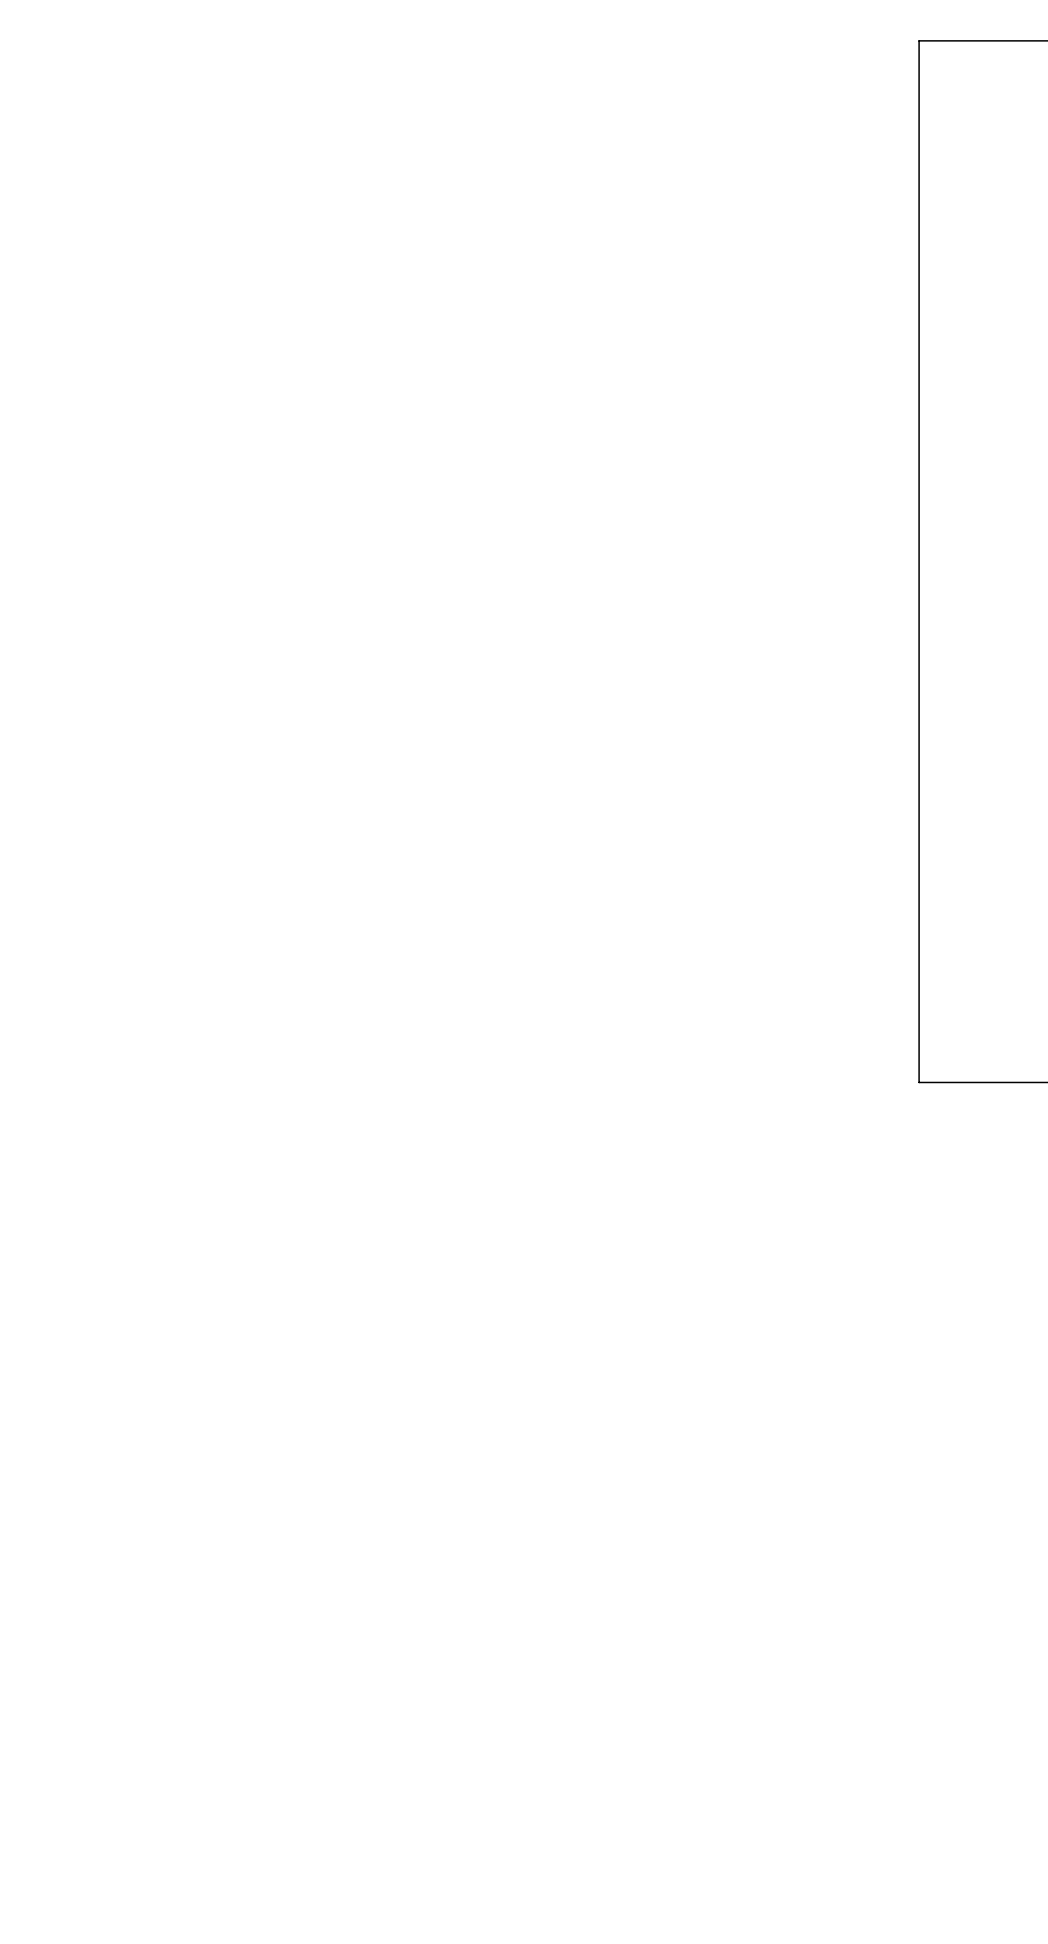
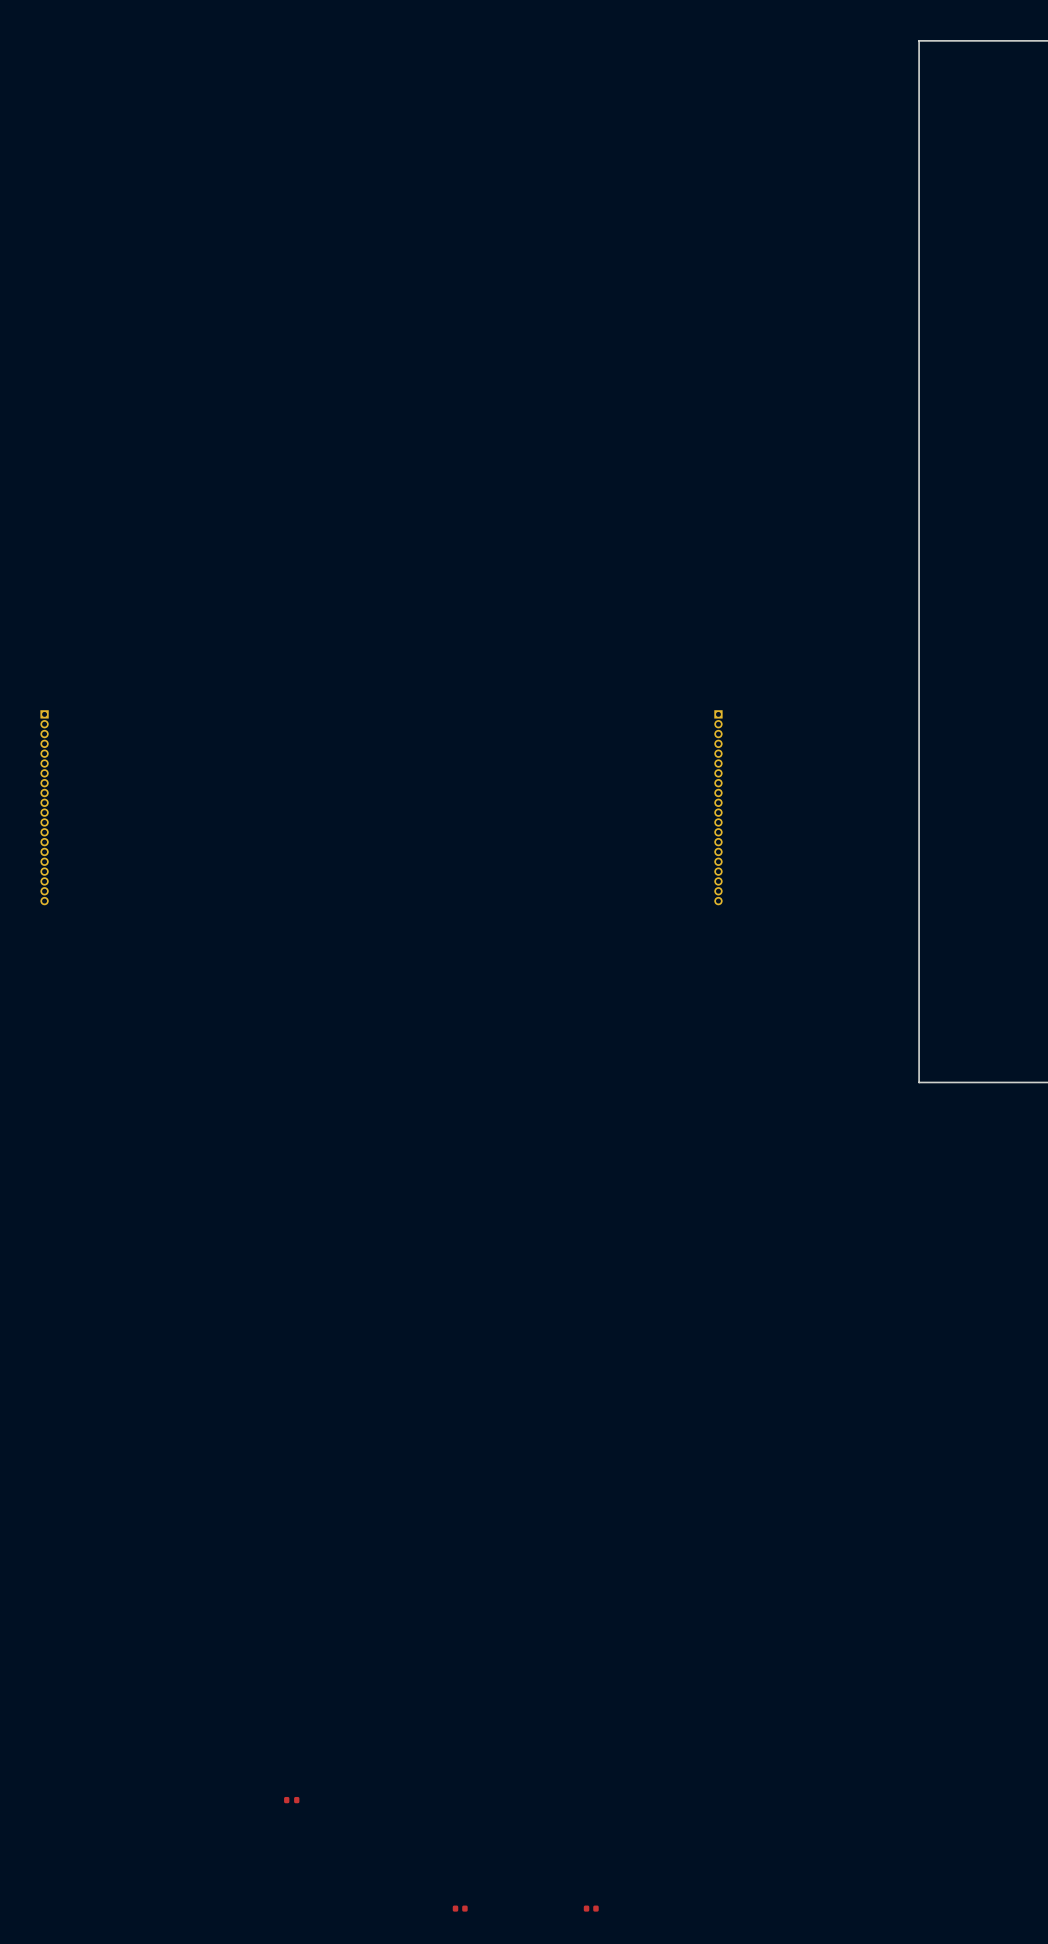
part: none -> (44, 807)
part: none -> (718, 807)
part: none -> (291, 1800)
part: none -> (460, 1908)
part: none -> (591, 1908)

